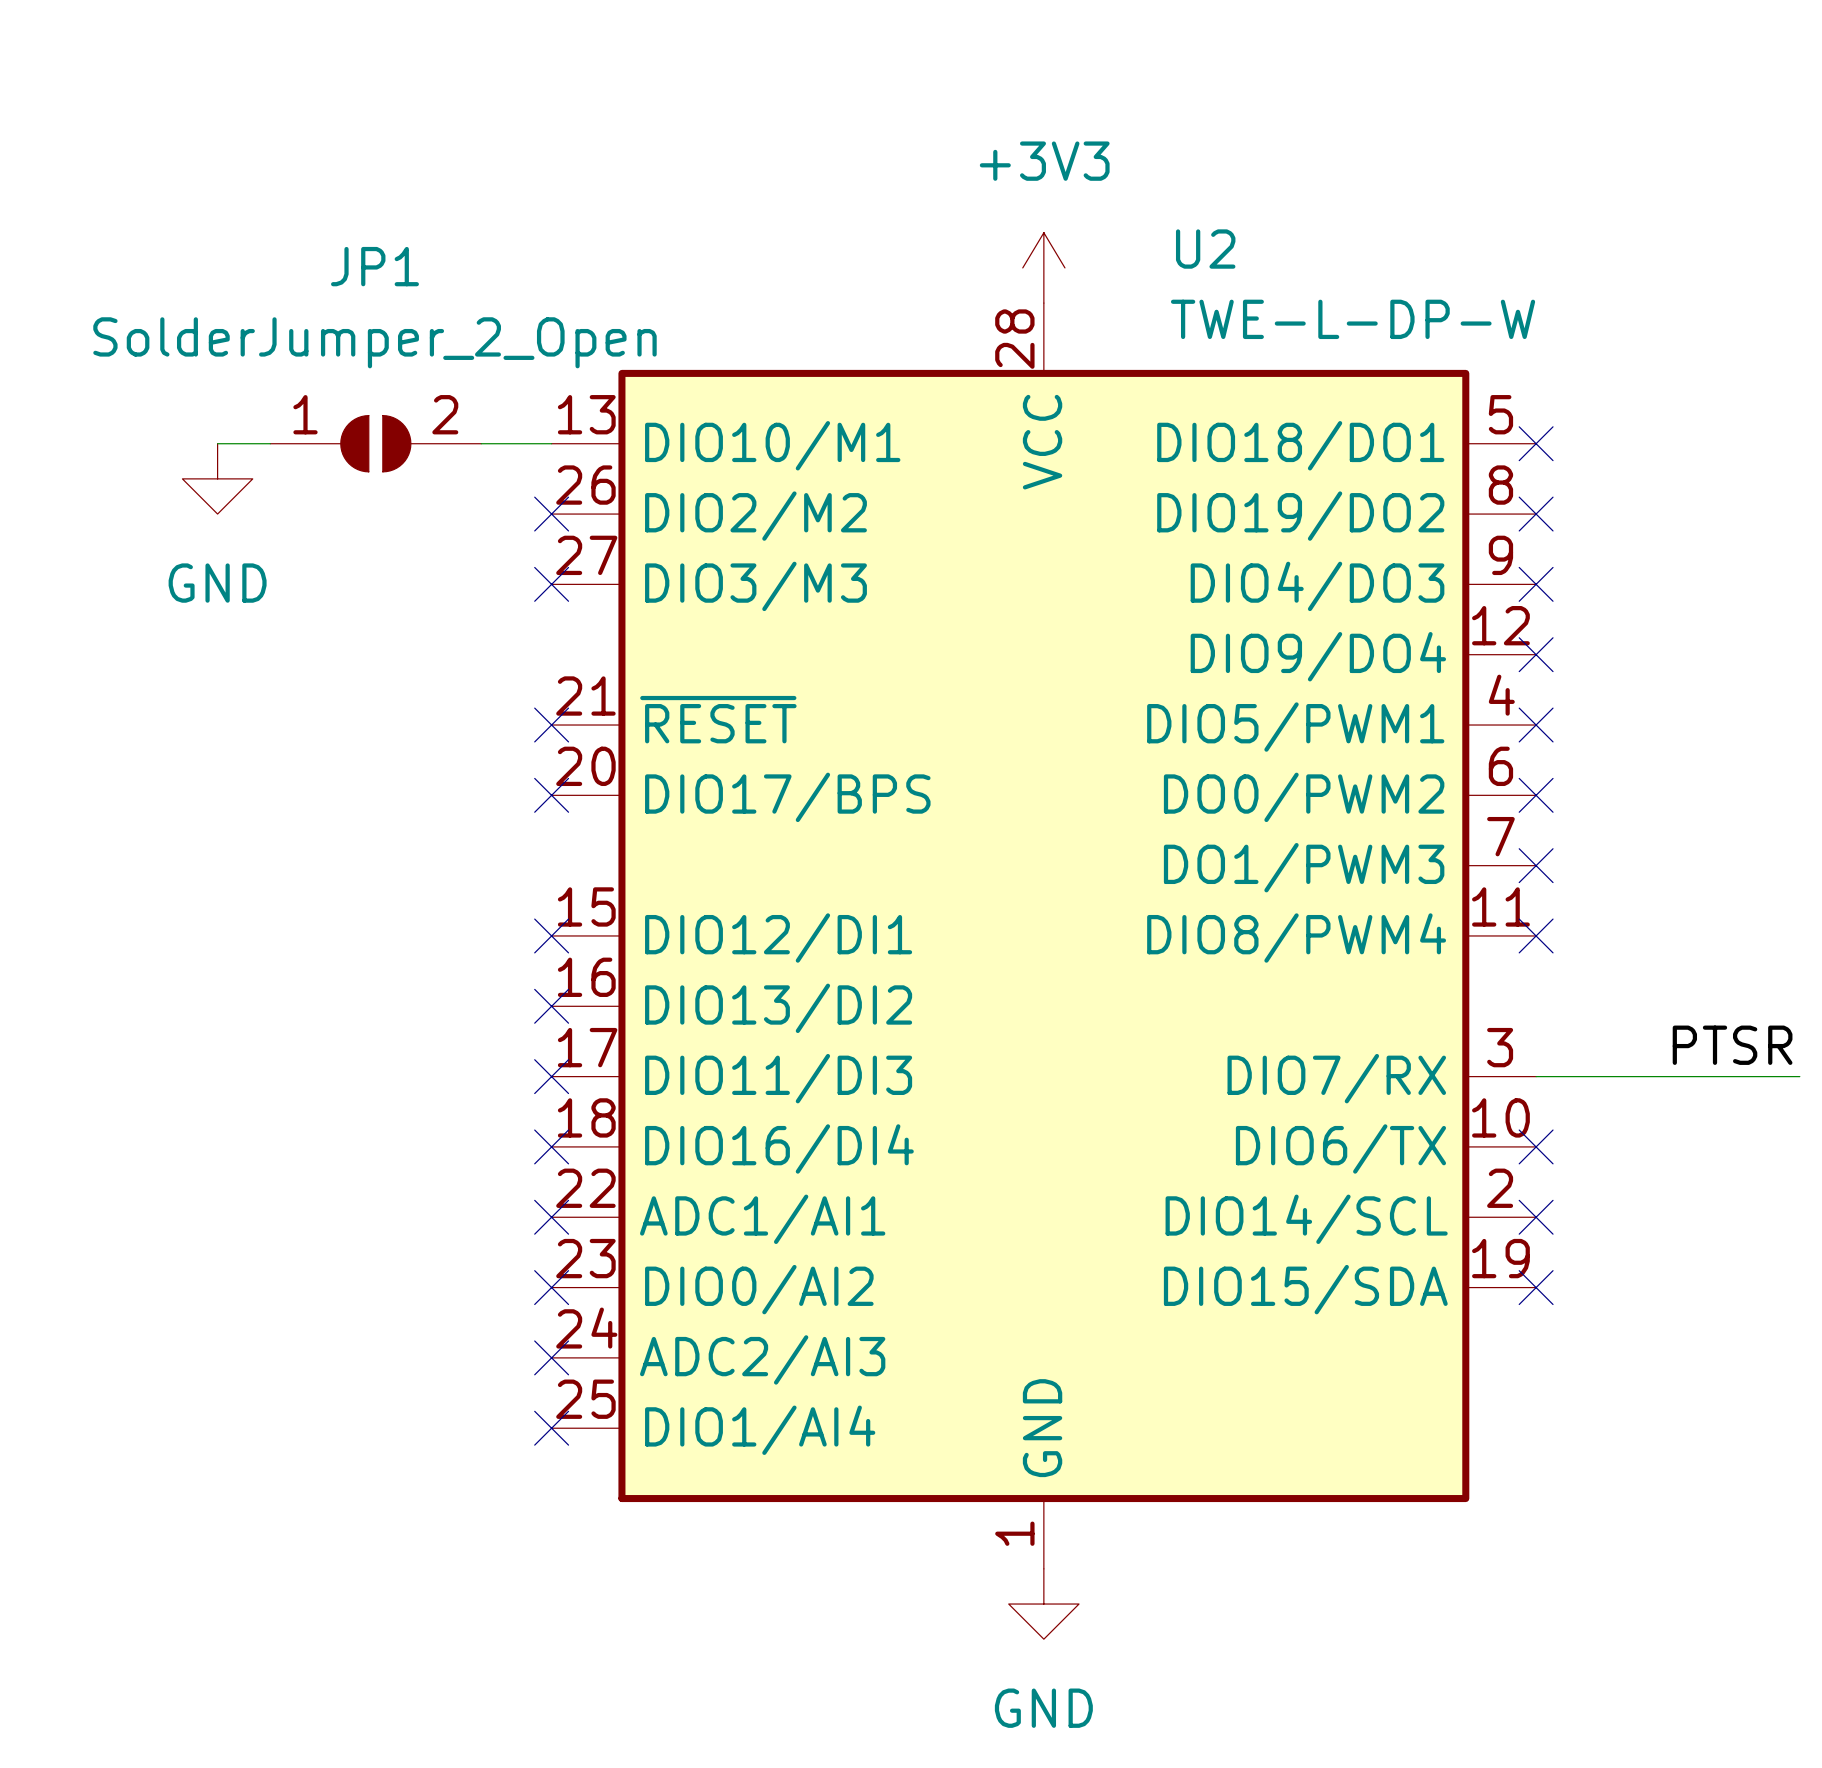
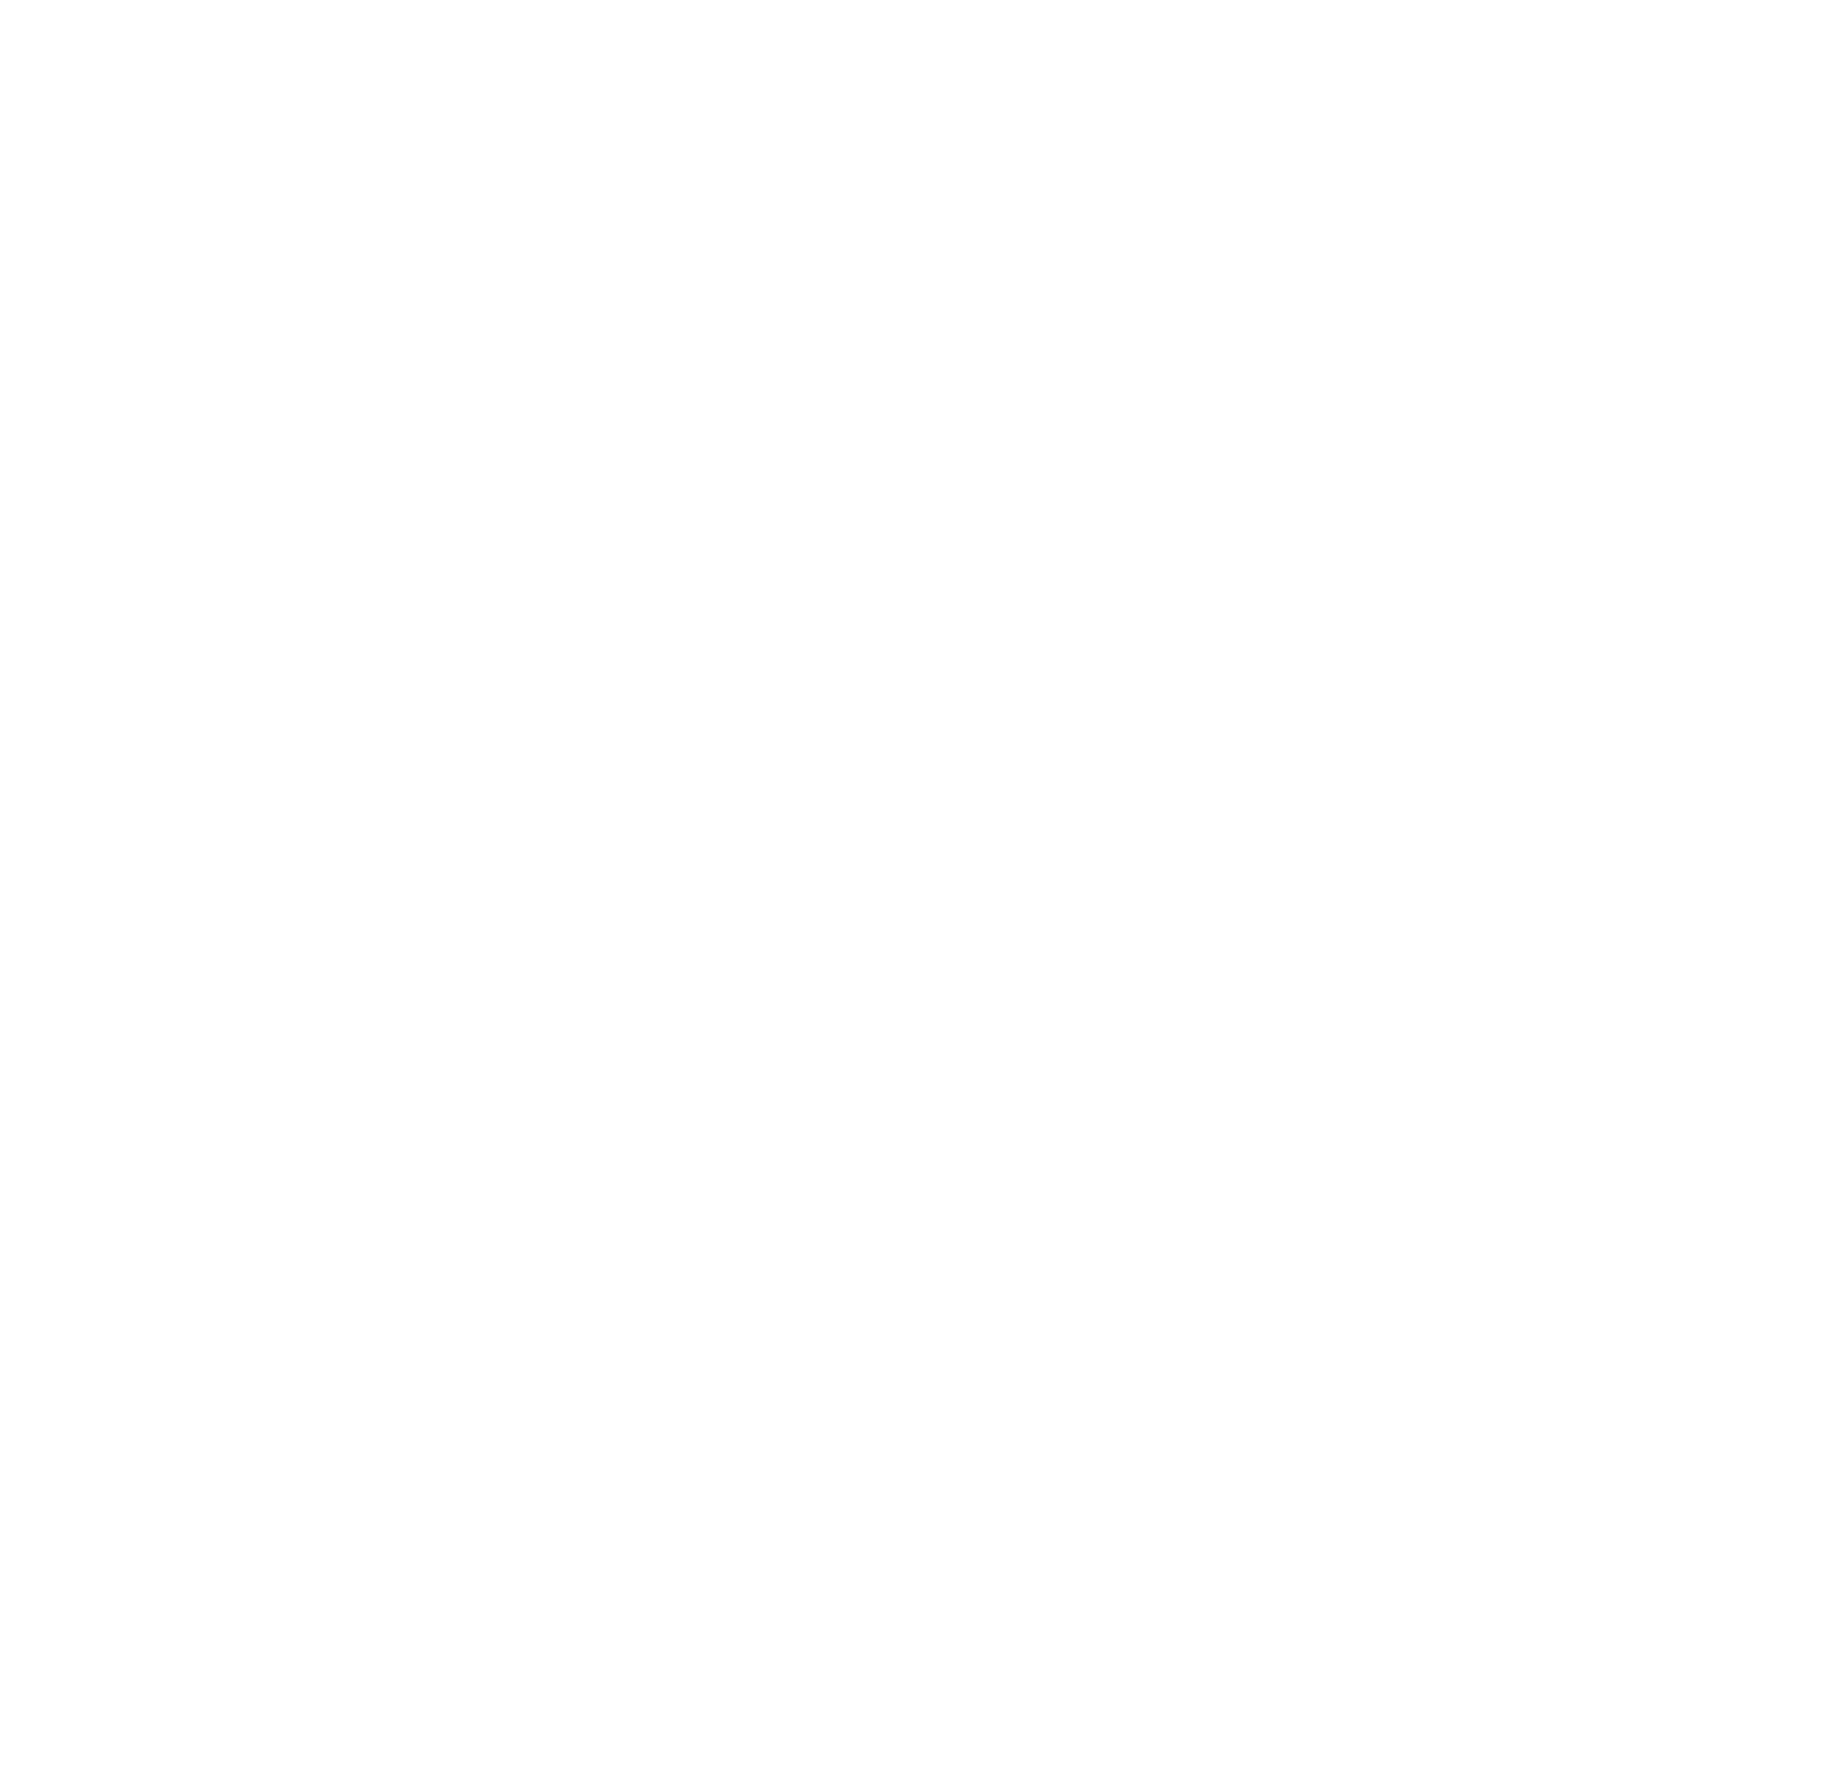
power symbol: +3V3 (1043, 267) -> none
wire: (217, 443) (270, 443) -> none
JP1: SolderJumper_2_Open (375, 443) -> none
wire: (481, 443) (551, 443) -> none
no-connect mark: (1536, 443) -> none
power symbol: GND (217, 478) -> none
no-connect mark: (551, 514) -> none
no-connect mark: (1536, 514) -> none
no-connect mark: (551, 584) -> none
no-connect mark: (1536, 584) -> none
no-connect mark: (1536, 654) -> none
no-connect mark: (551, 725) -> none
no-connect mark: (1536, 725) -> none
no-connect mark: (551, 795) -> none
no-connect mark: (1536, 795) -> none
no-connect mark: (1536, 865) -> none
no-connect mark: (551, 935) -> none
U2: TWE-L-DP-W (1043, 935) -> none
no-connect mark: (1536, 935) -> none
no-connect mark: (551, 1006) -> none
label: PTSR (1732, 1045) -> none
no-connect mark: (551, 1076) -> none
wire: (1536, 1076) (1799, 1076) -> none
no-connect mark: (551, 1146) -> none
no-connect mark: (1536, 1146) -> none
no-connect mark: (551, 1217) -> none
no-connect mark: (1536, 1217) -> none
no-connect mark: (551, 1287) -> none
no-connect mark: (1536, 1287) -> none
no-connect mark: (551, 1357) -> none
no-connect mark: (551, 1428) -> none
power symbol: GND (1043, 1604) -> none

